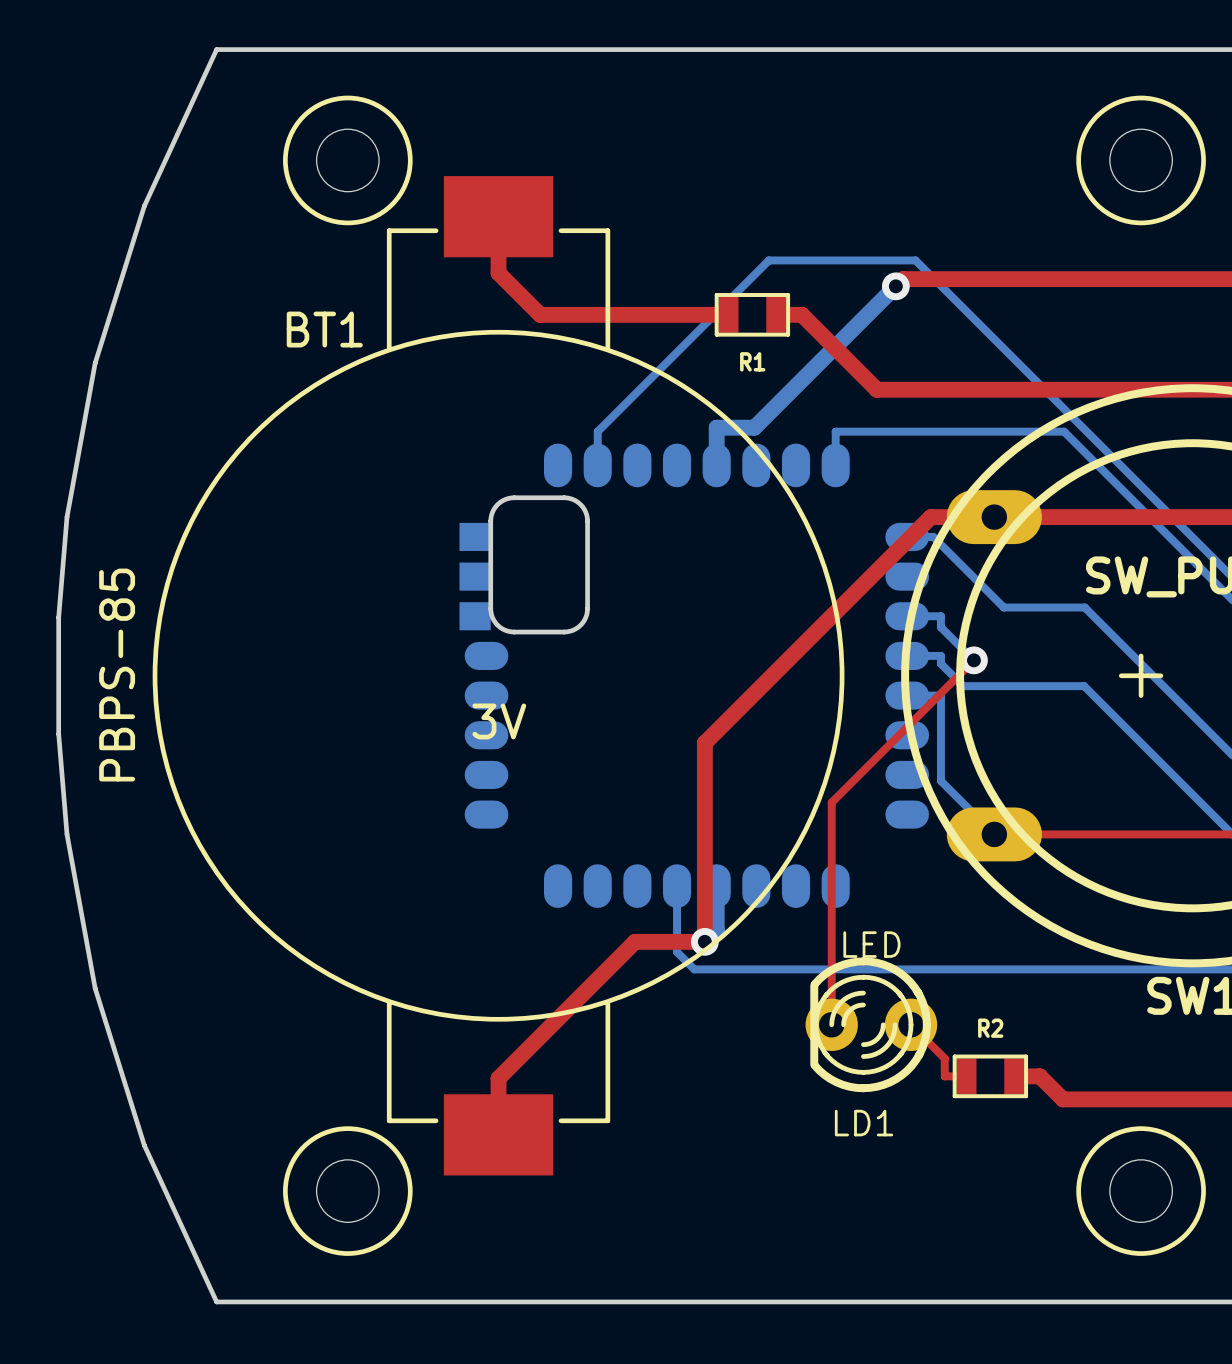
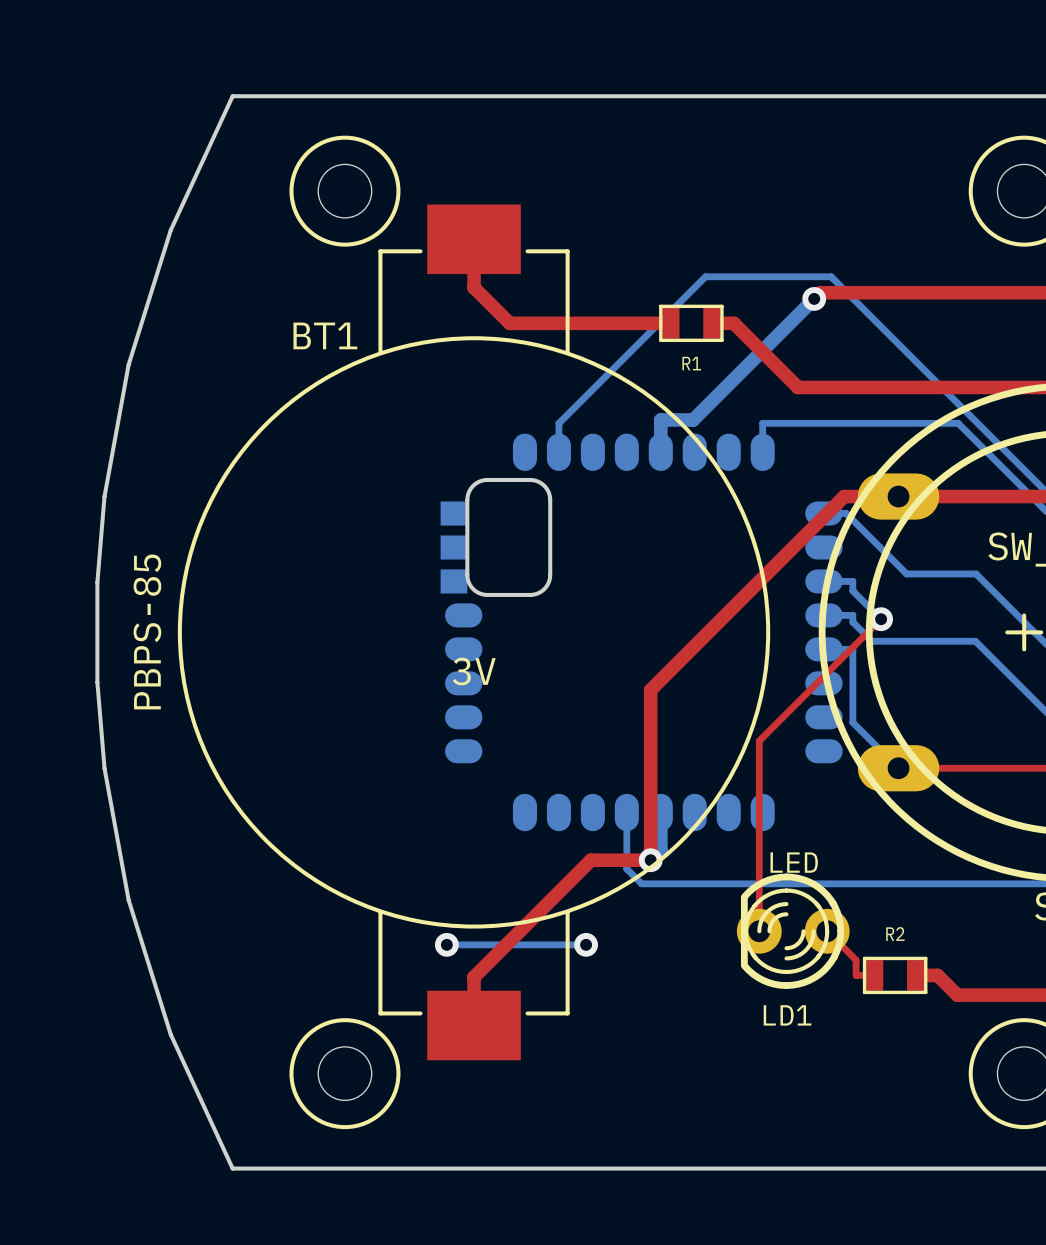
bottom track: none -> (446, 944) (586, 944)
via: none -> (446, 944)
via: none -> (586, 944)

